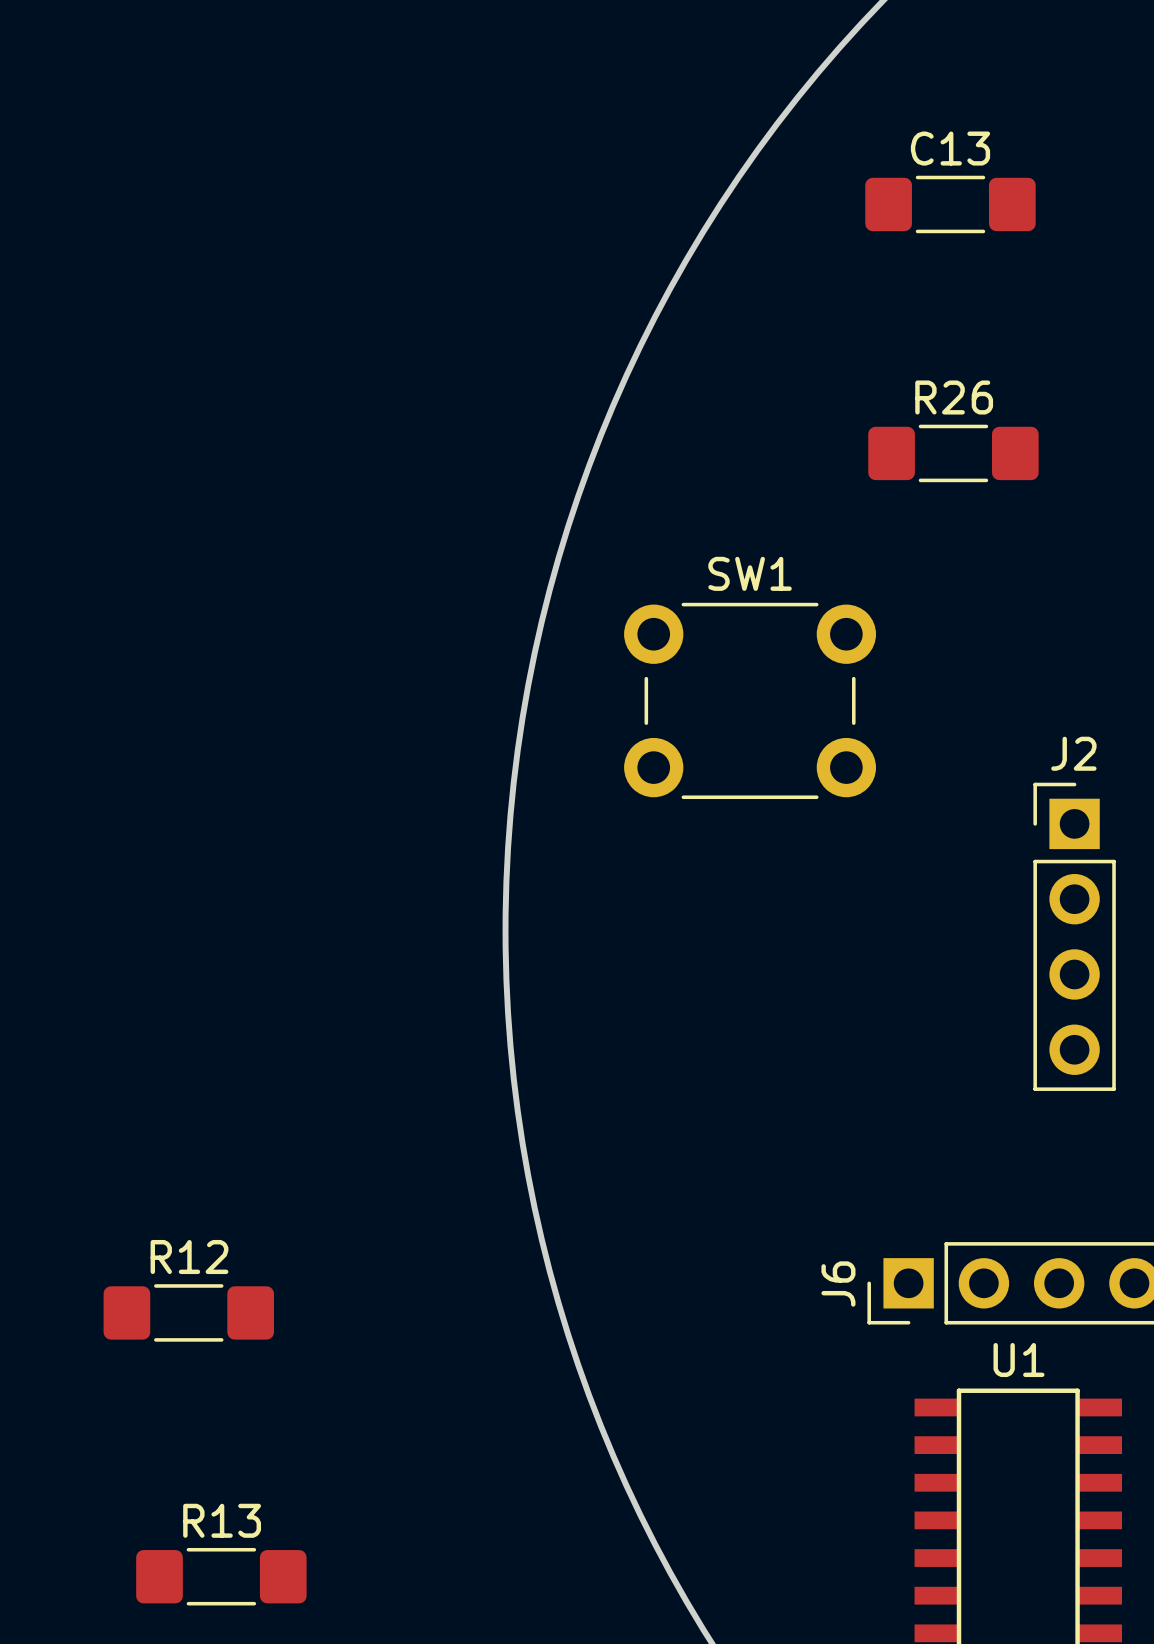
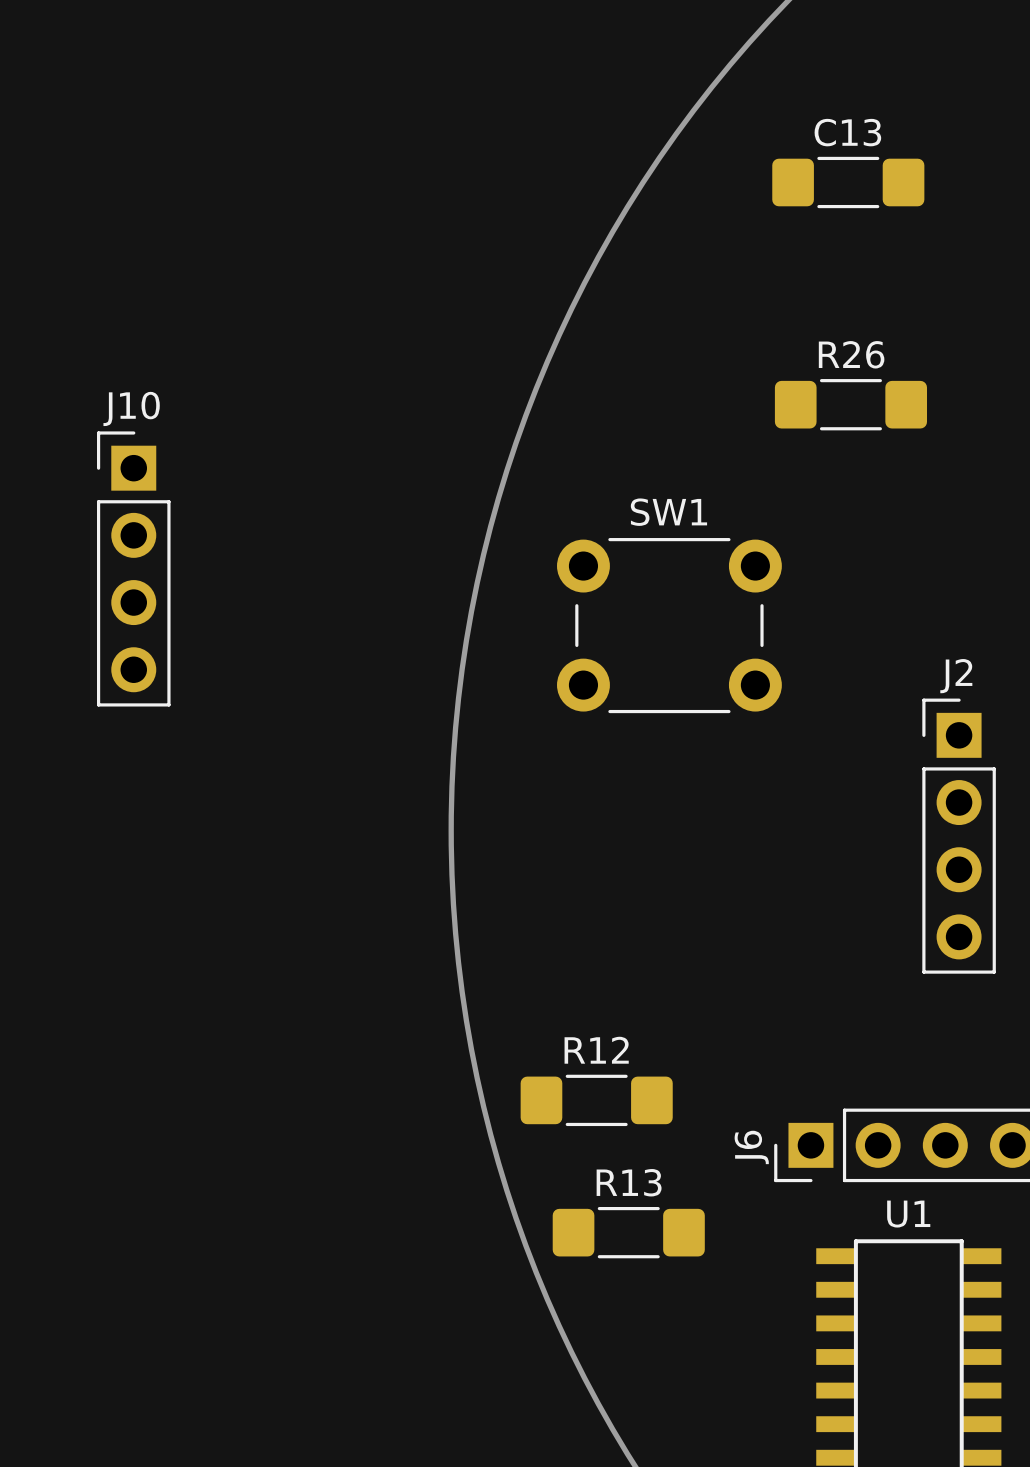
J10: none -> (133, 568)
R12 position: (188, 1312) -> (596, 1100)
R13 position: (221, 1576) -> (628, 1232)

